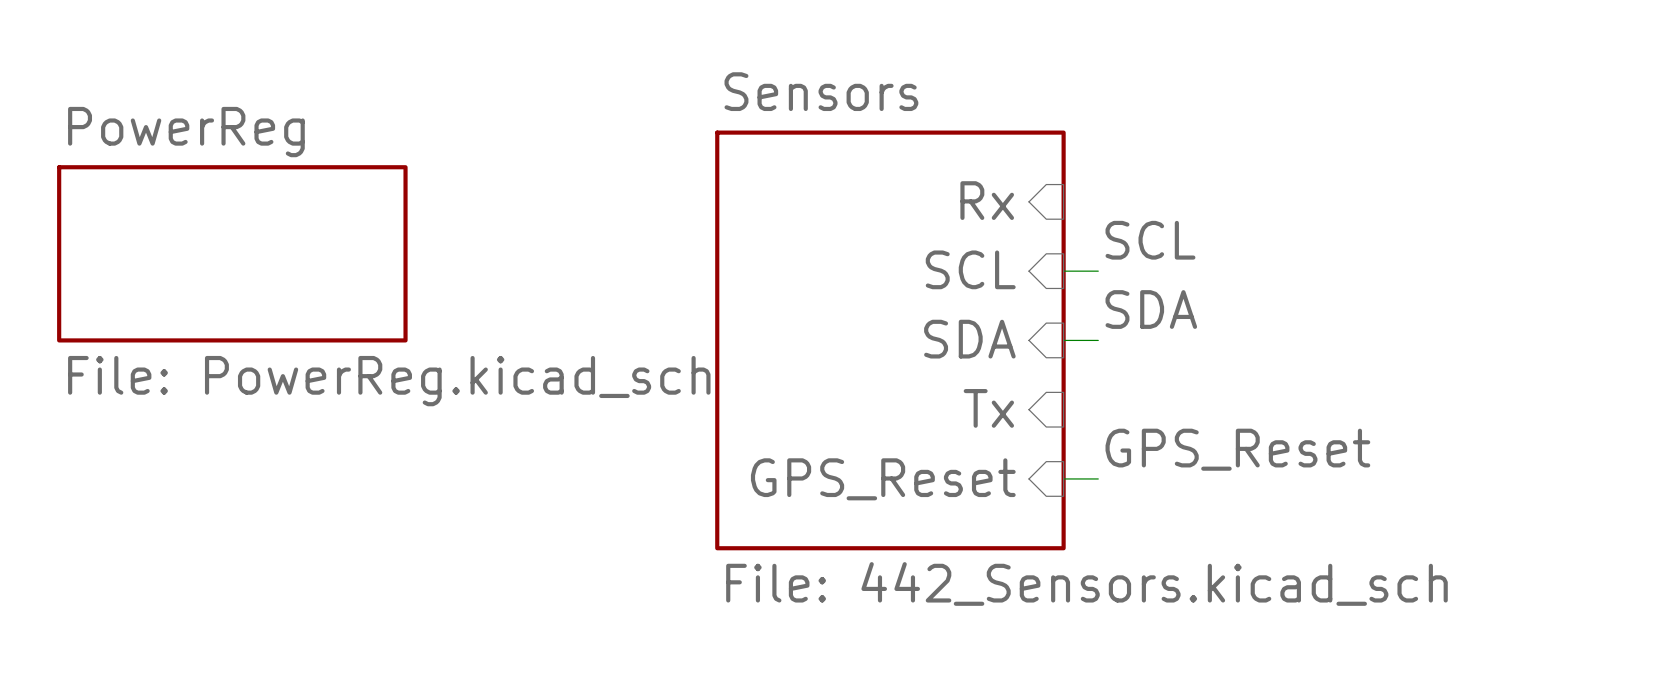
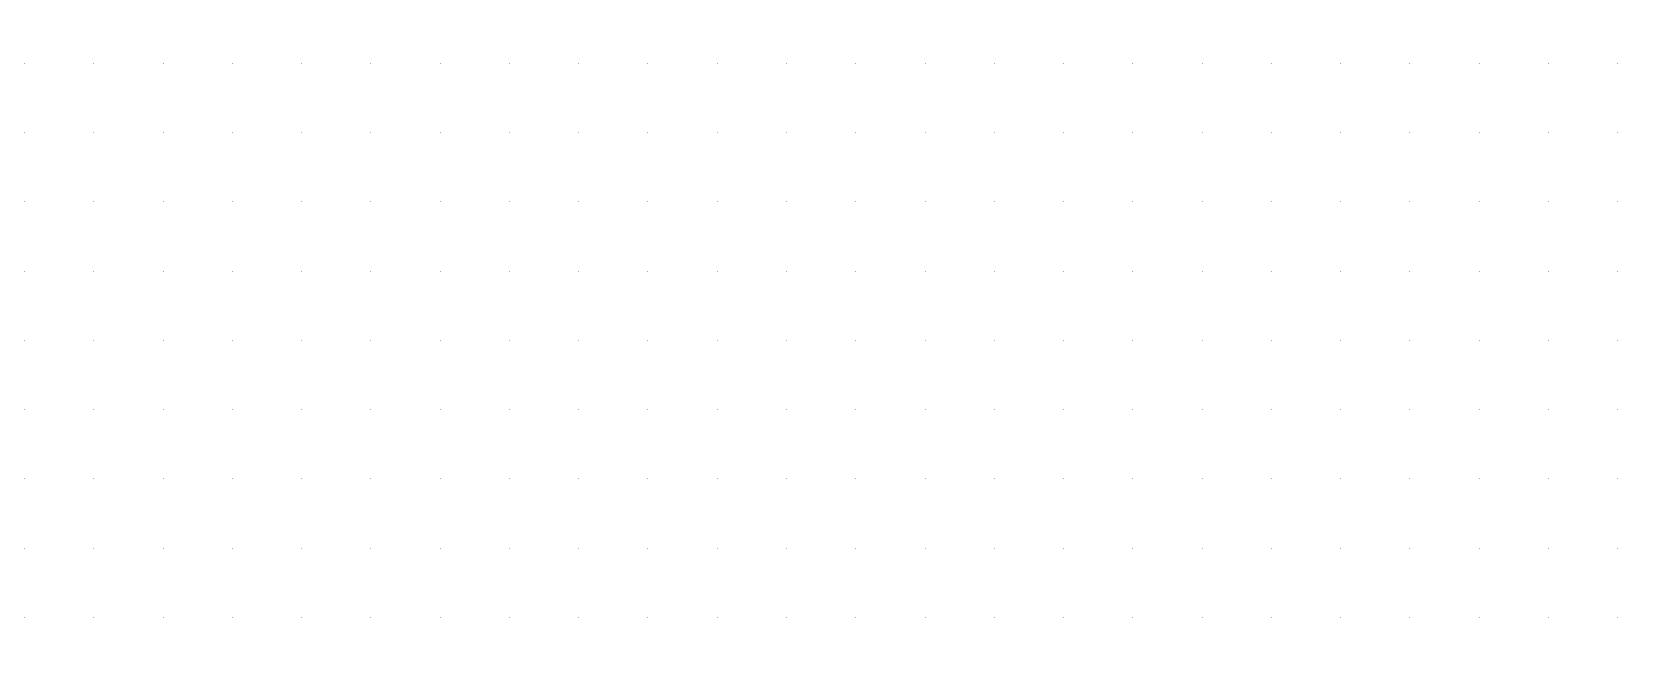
sheet pin: Rx (987, 200) -> none
label: SCL (1150, 240) -> none
sheet PowerReg: File: PowerReg.kicad_sch (232, 253) -> none
sheet pin: SCL (970, 269) -> none
wire: (1063, 271) (1098, 271) -> none
label: SDA (1151, 309) -> none
sheet pin: SDA (969, 339) -> none
sheet Sensors: File: 442_Sensors.kicad_sch (890, 340) -> none
wire: (1063, 340) (1098, 340) -> none
sheet pin: Tx (988, 408) -> none
label: GPS_Reset (1237, 449) -> none
wire: (1063, 478) (1098, 478) -> none
sheet pin: GPS_Reset (883, 479) -> none

